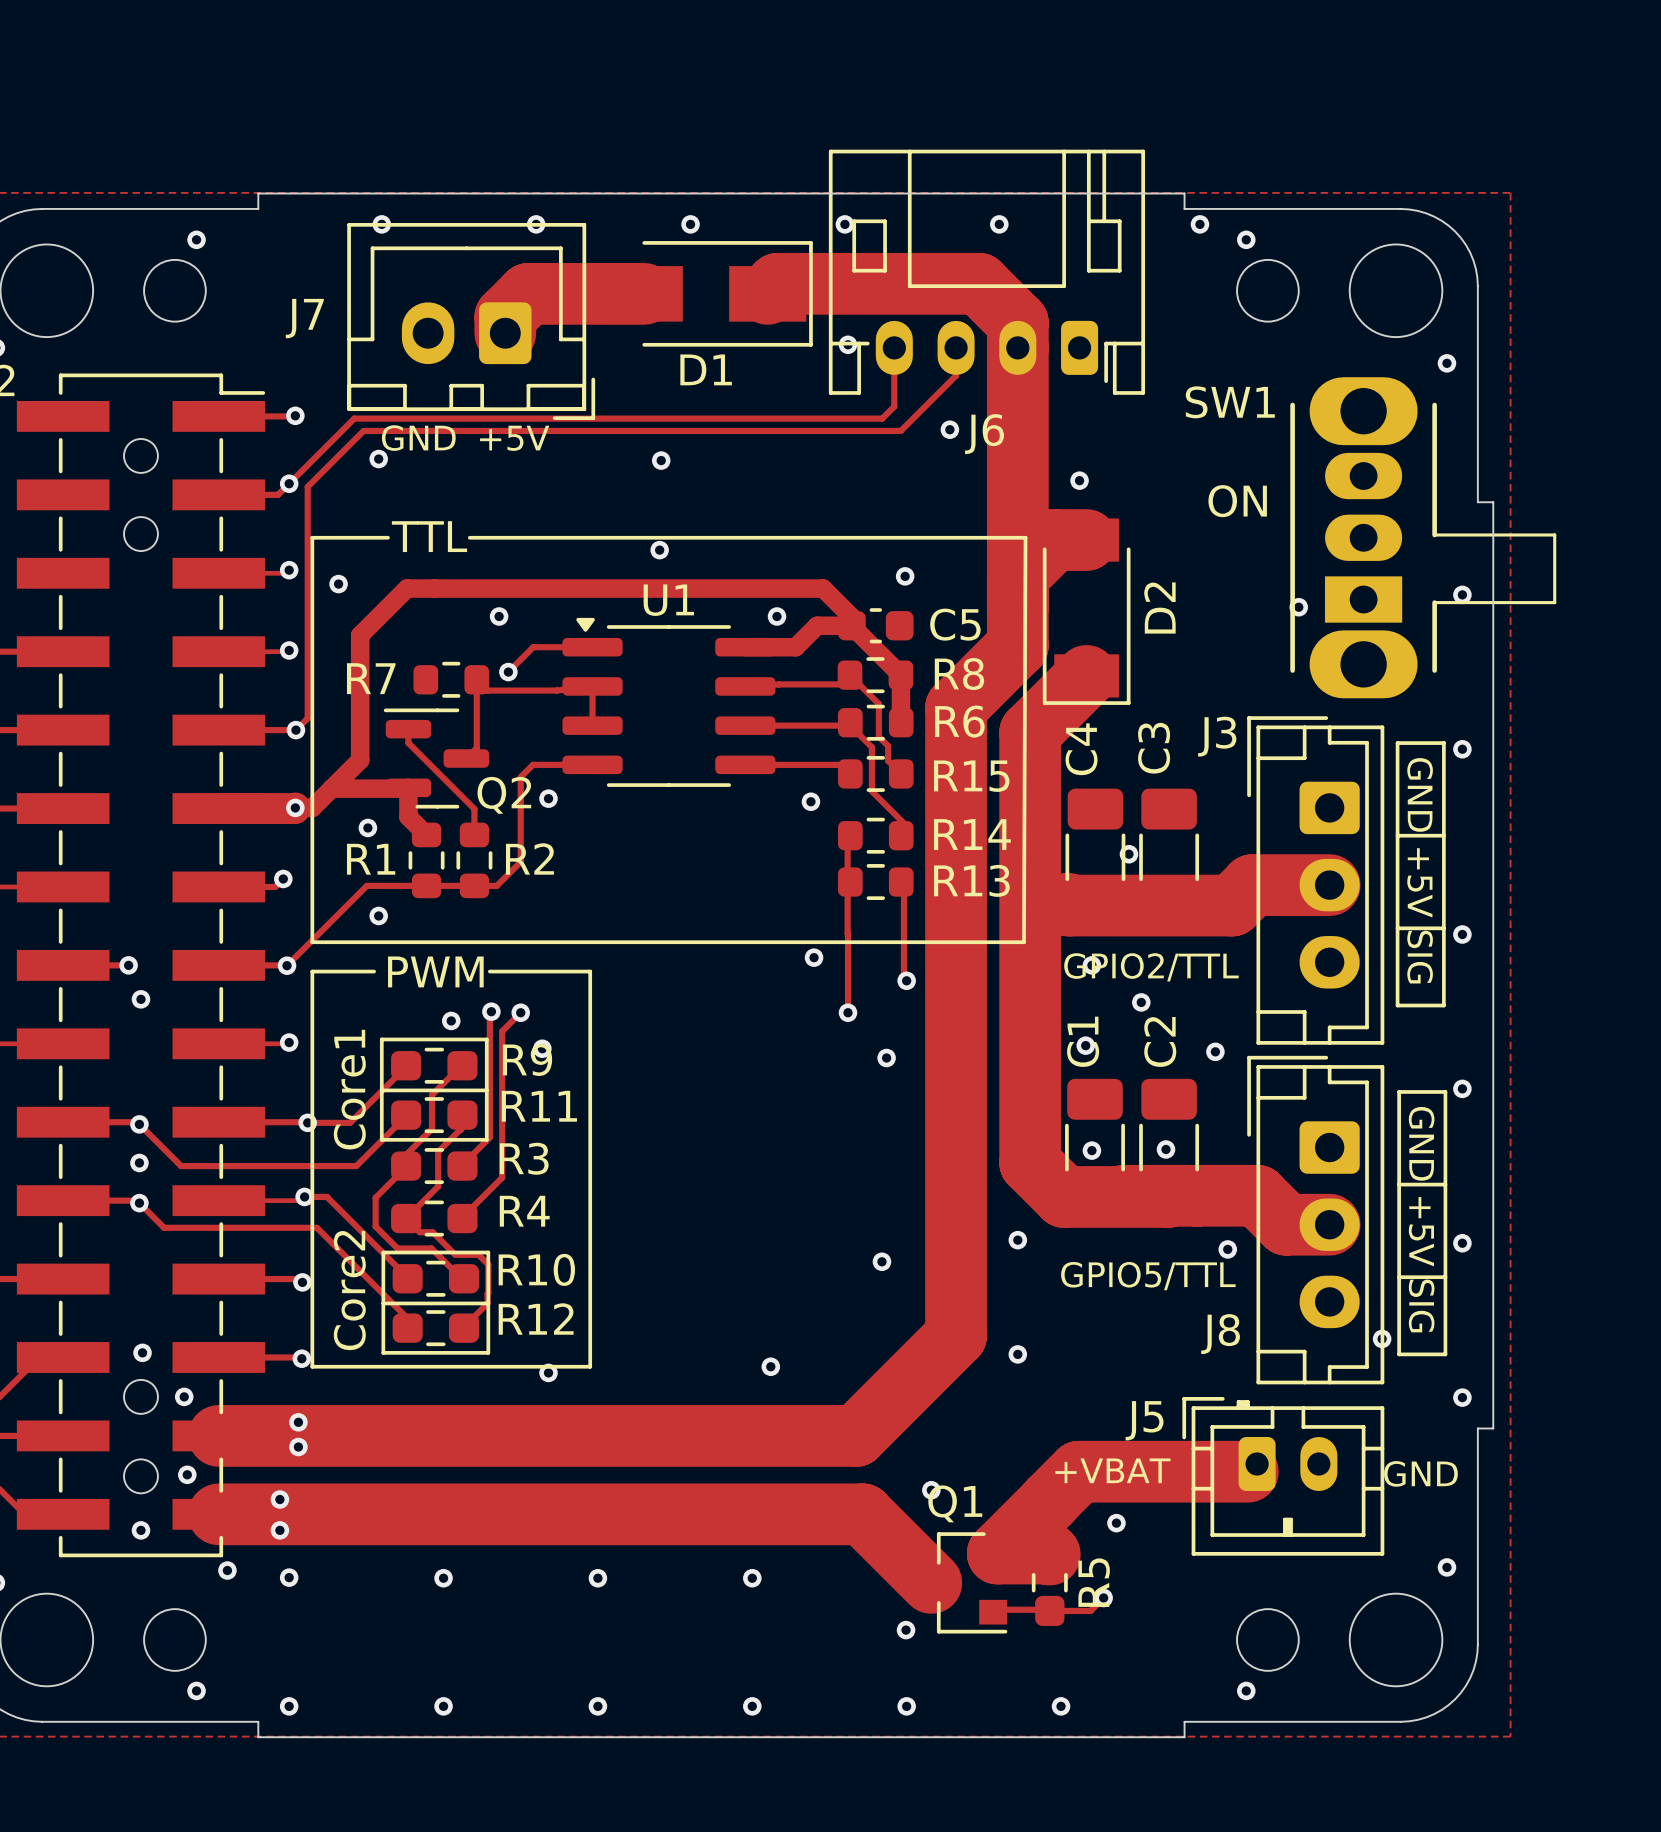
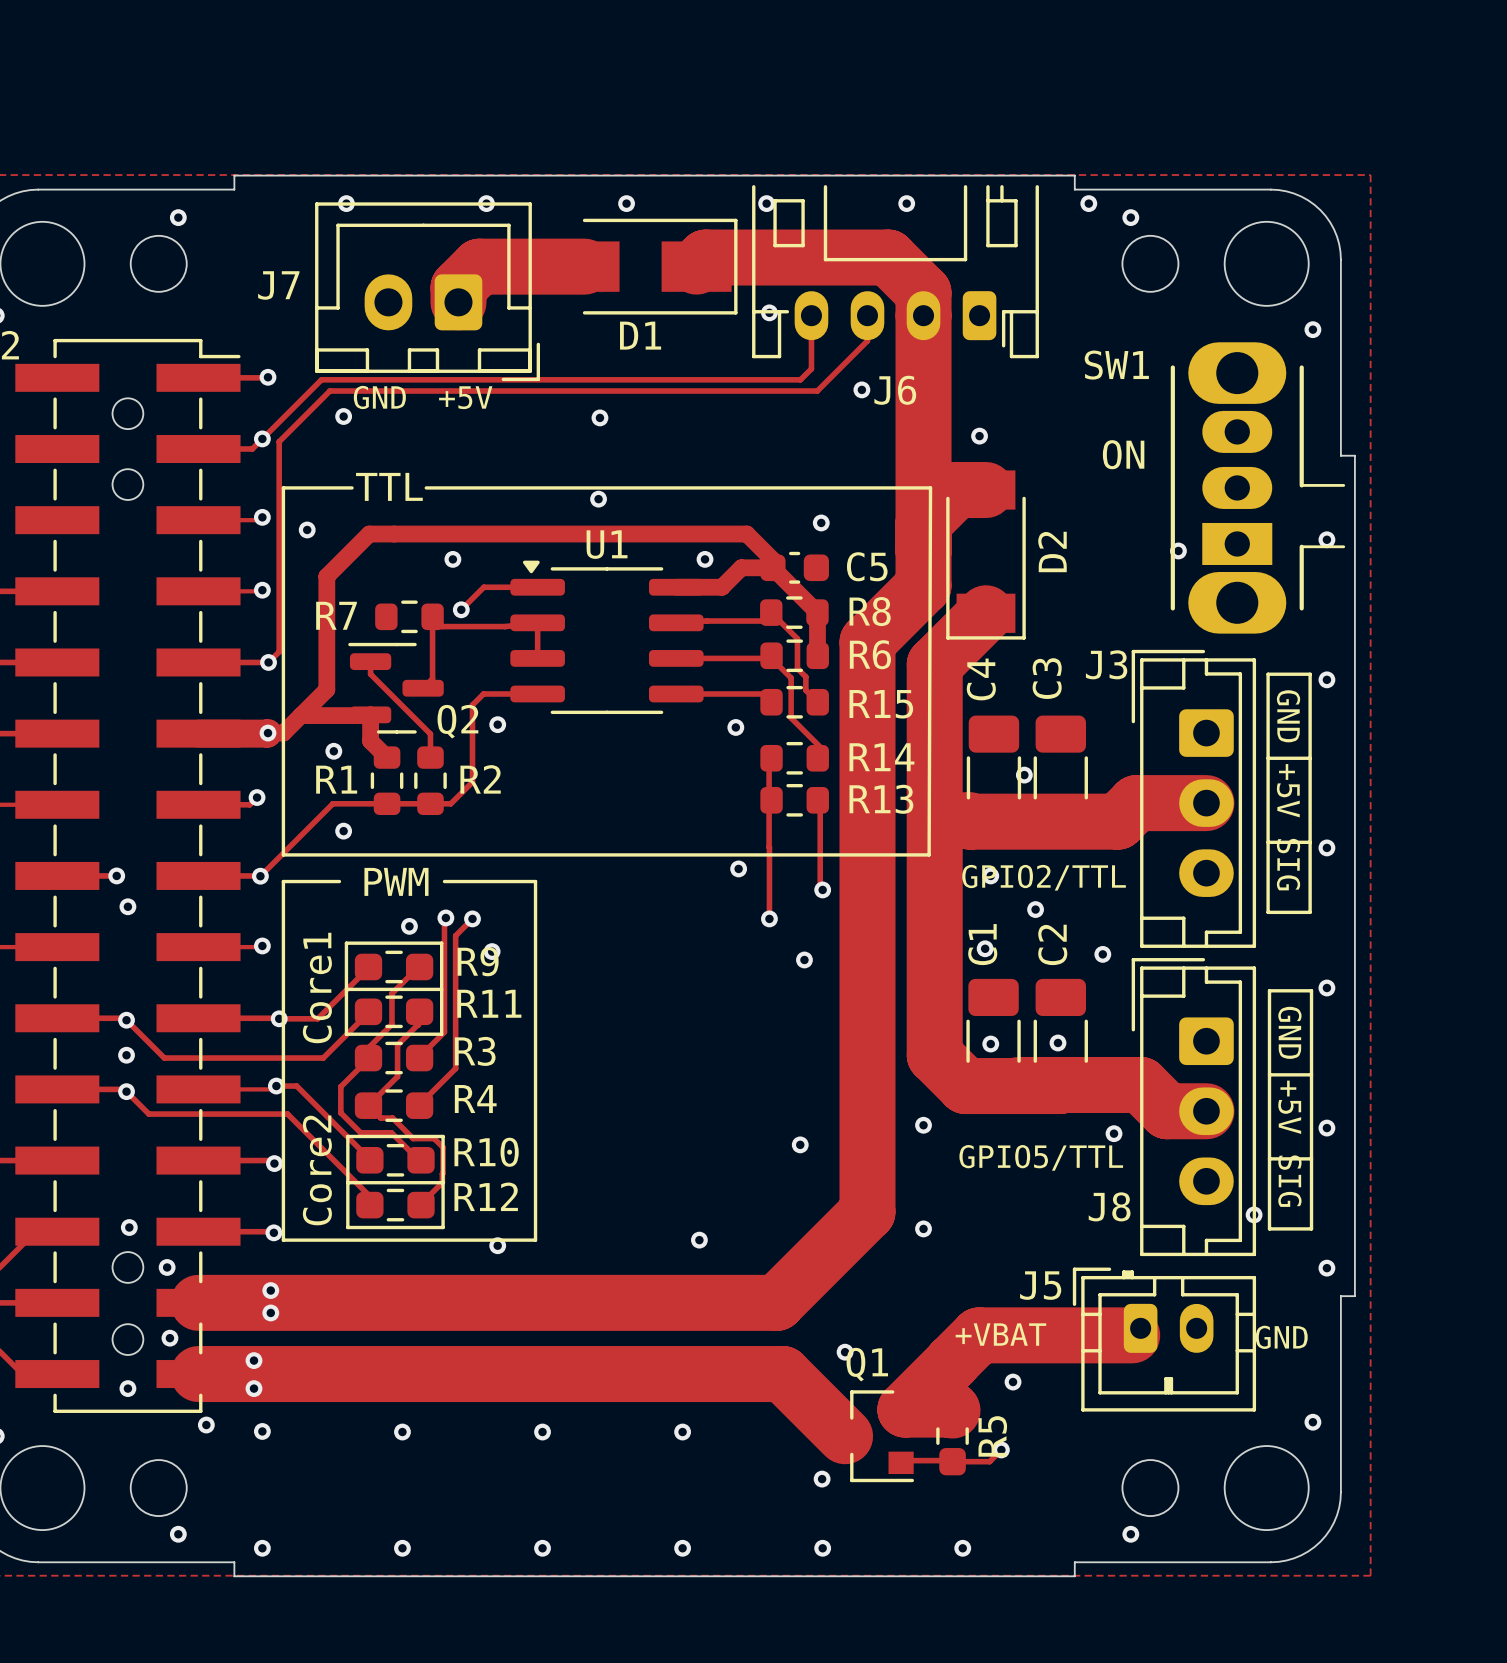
J6 footprint: [828, 149, 1146, 395] -> [752, 185, 1039, 359]
SW1 footprint: [1290, 377, 1557, 699] -> [1170, 342, 1346, 634]

